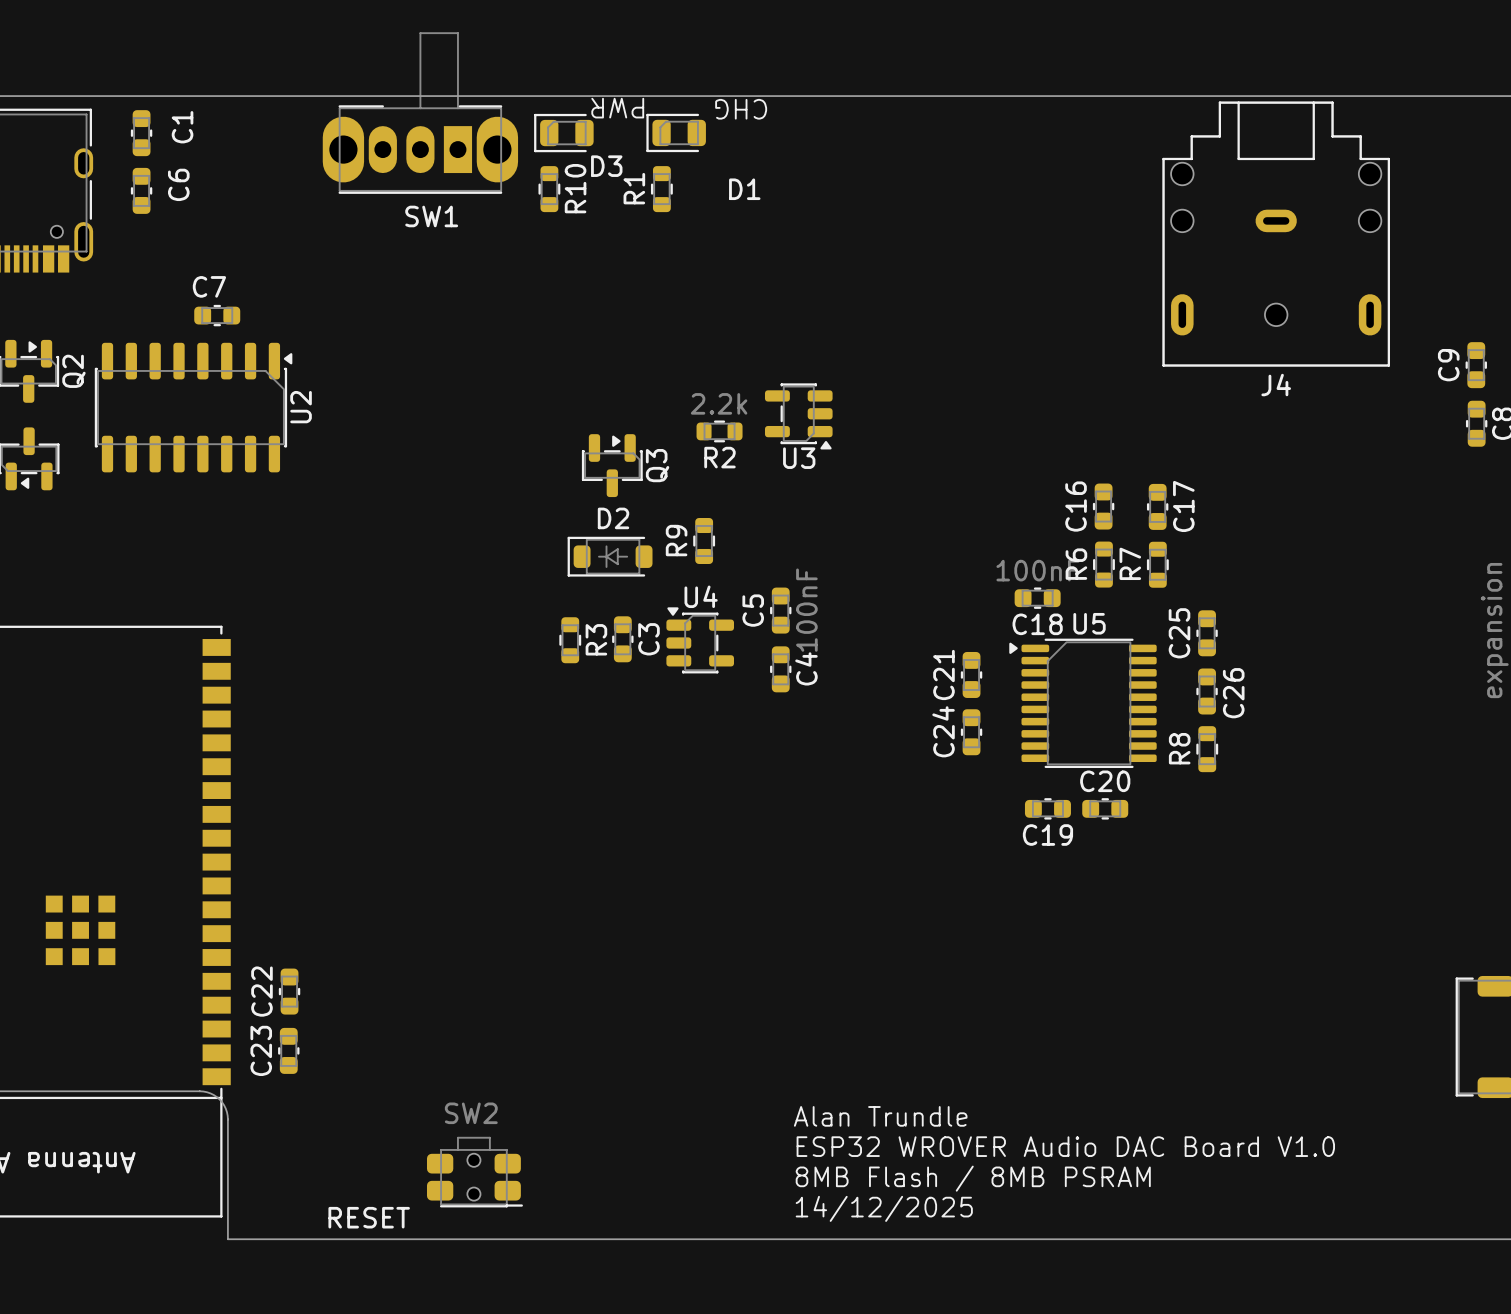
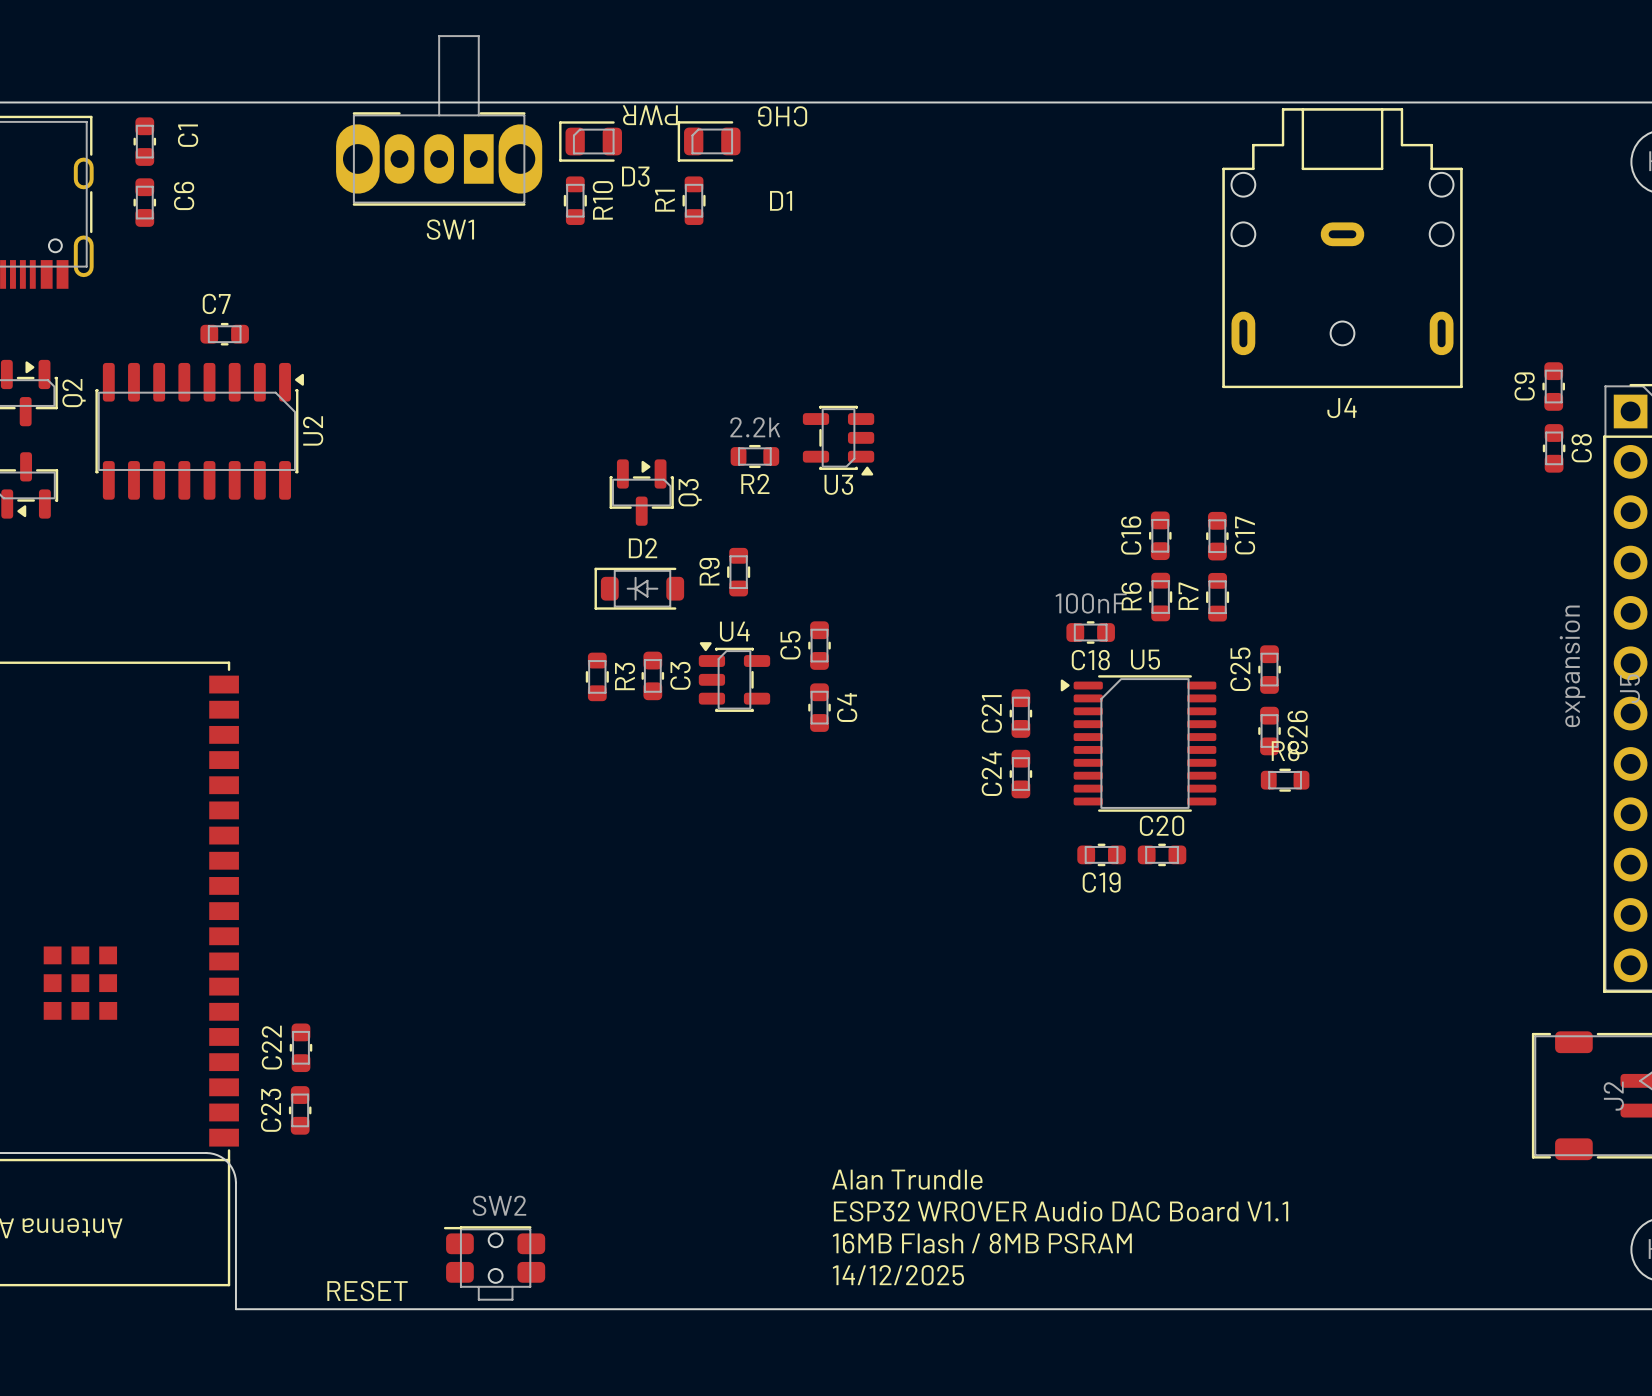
C5 value: 100nF (806, 610) -> none
R8 rotation: 0° (1207, 749) -> 90° clockwise (1285, 780)
text: ESP32 WROVER Audio DAC Board V1.0 (1065, 1146) -> ESP32 WROVER Audio DAC Board V1.1 (1061, 1211)
SW2 rotation: 0° (474, 1172) -> 180° (494, 1263)
text: 8MB Flash / 8MB PSRAM (973, 1178) -> 16MB Flash / 8MB PSRAM (982, 1243)

